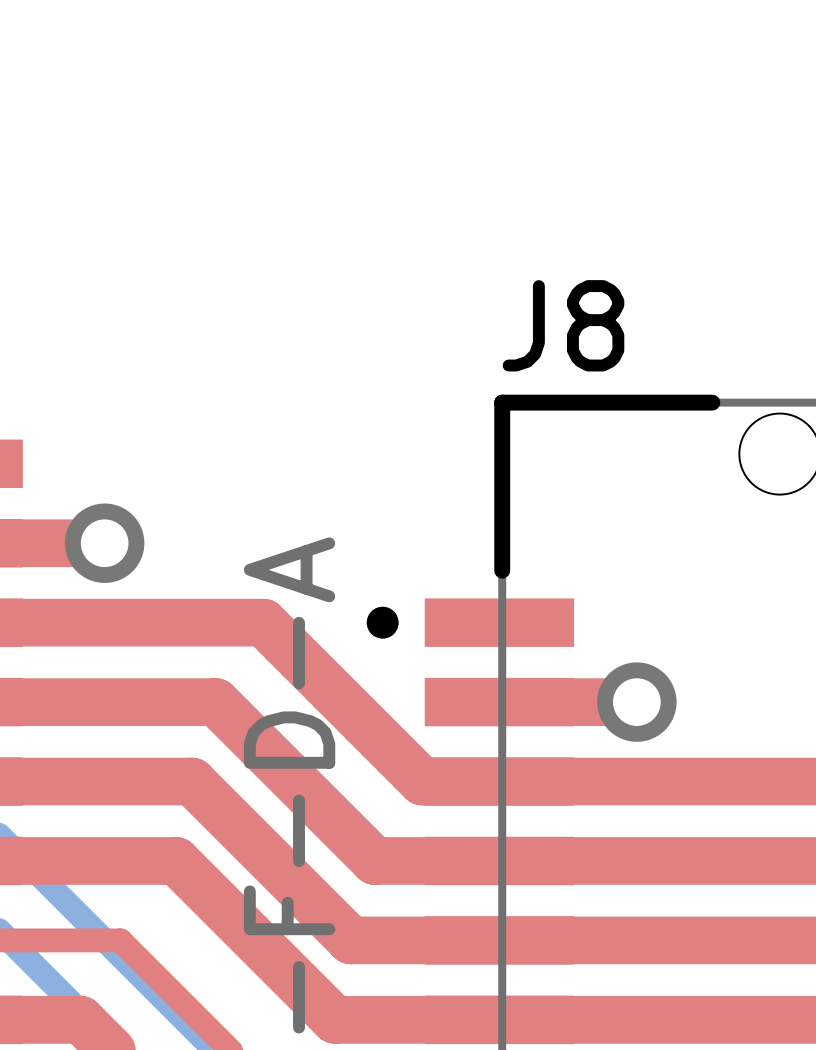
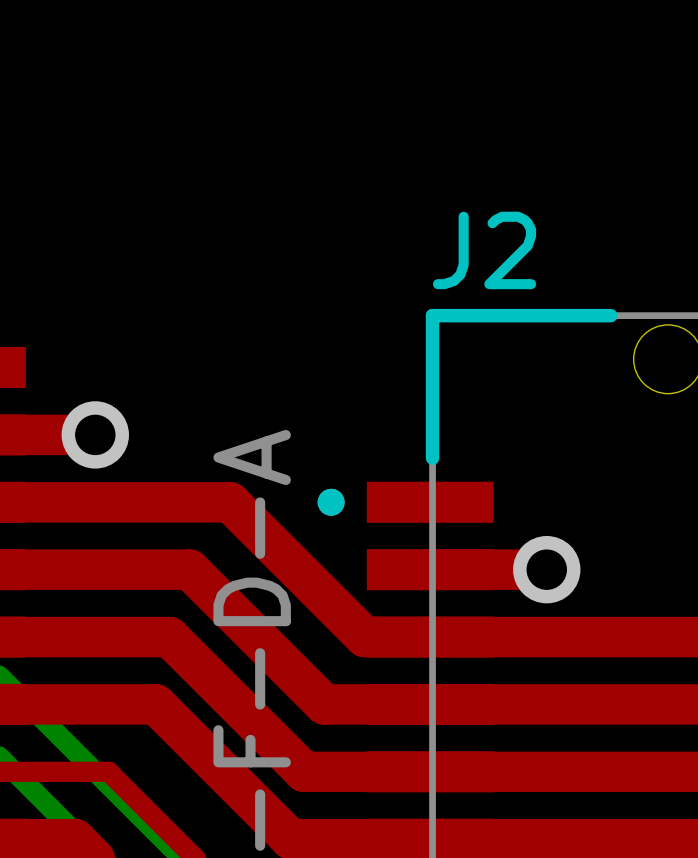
J8 name: J8 (563, 325) -> J2 (484, 250)

